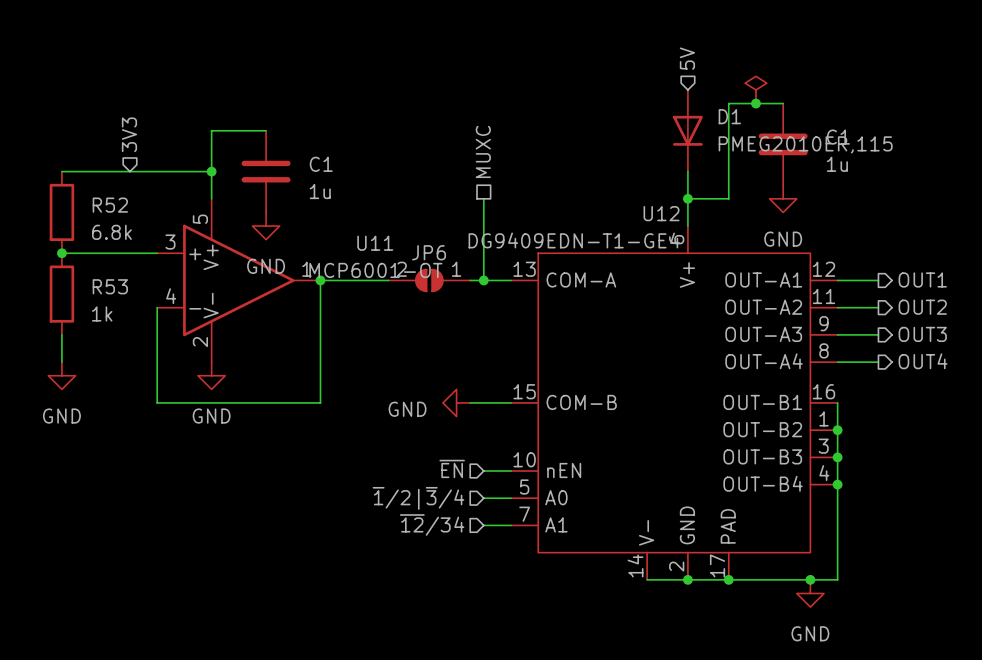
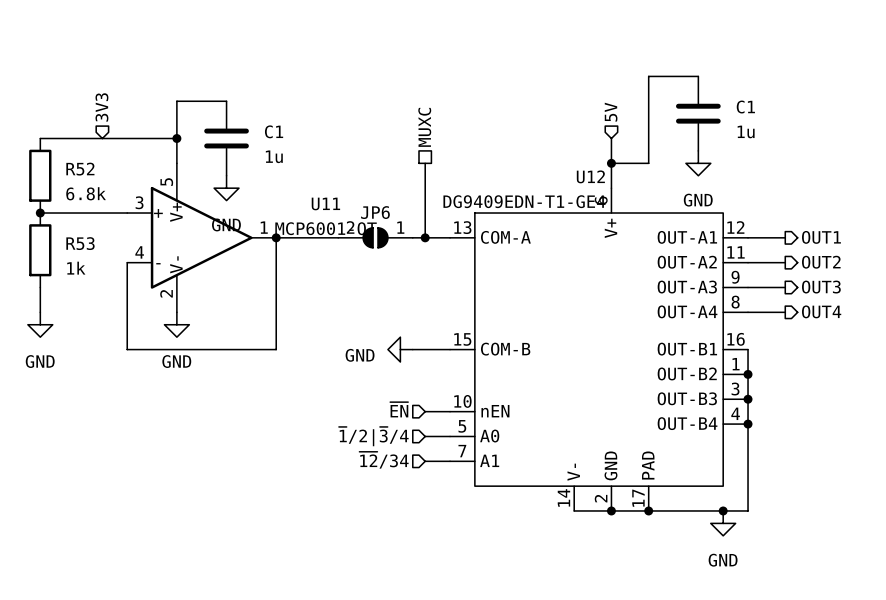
hierarchical label position: 5V (687, 58) -> 5V (611, 112)
power symbol: (755, 89) -> none
junction: (755, 103) -> none
D1: PMEG2010ER,115 (687, 130) -> none

